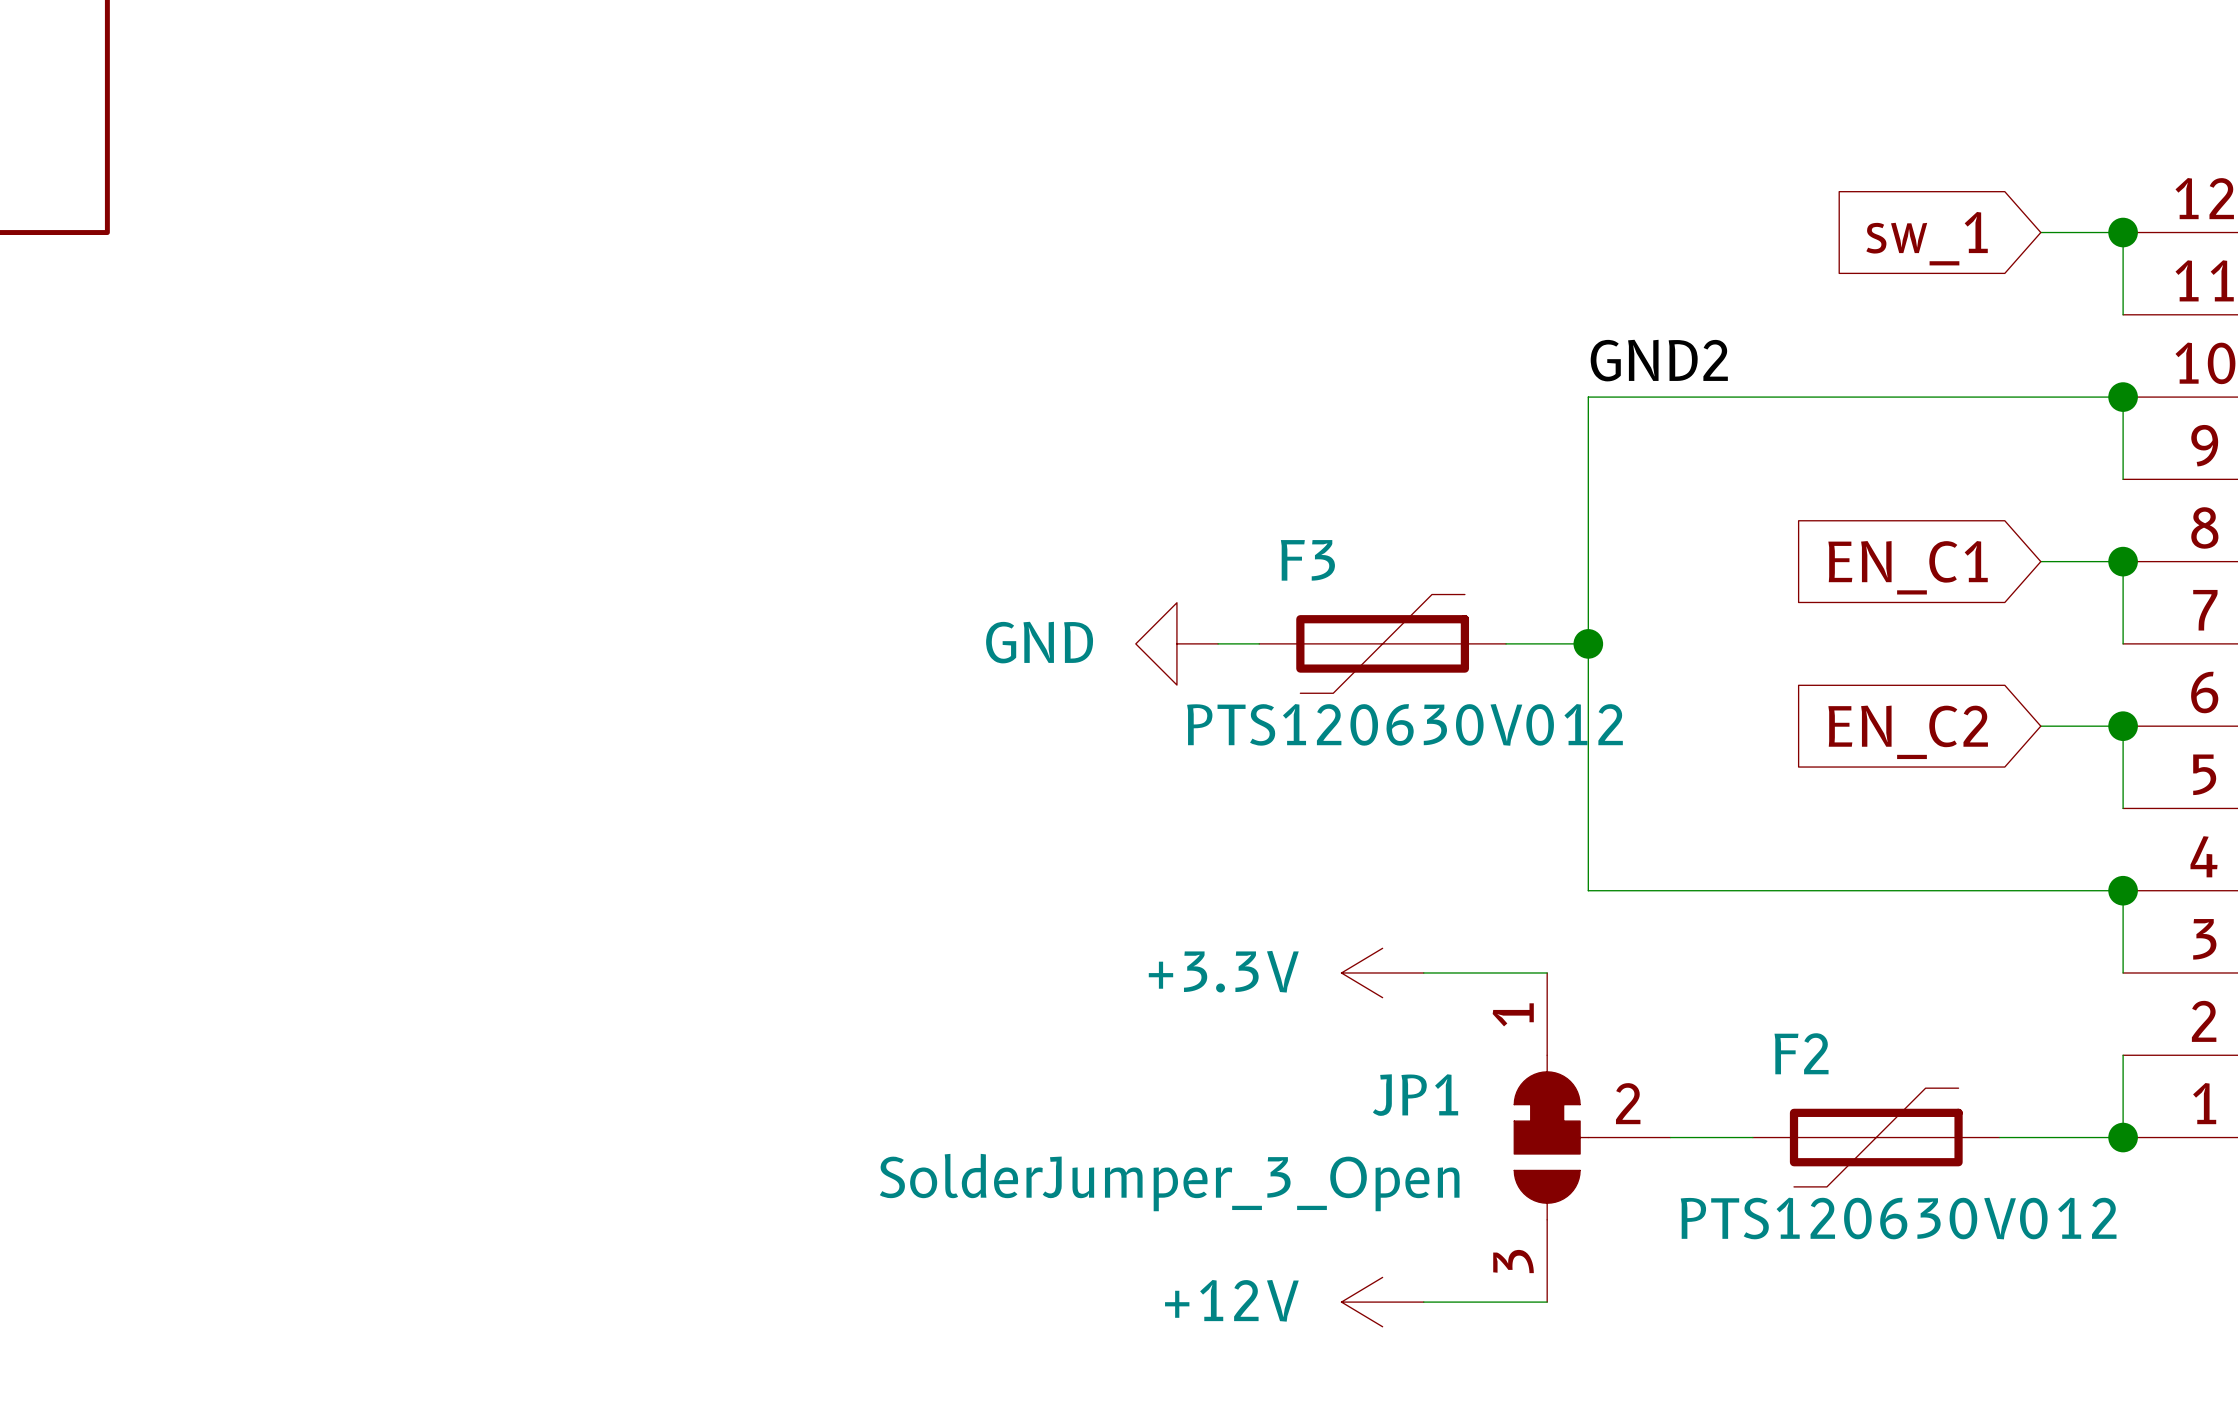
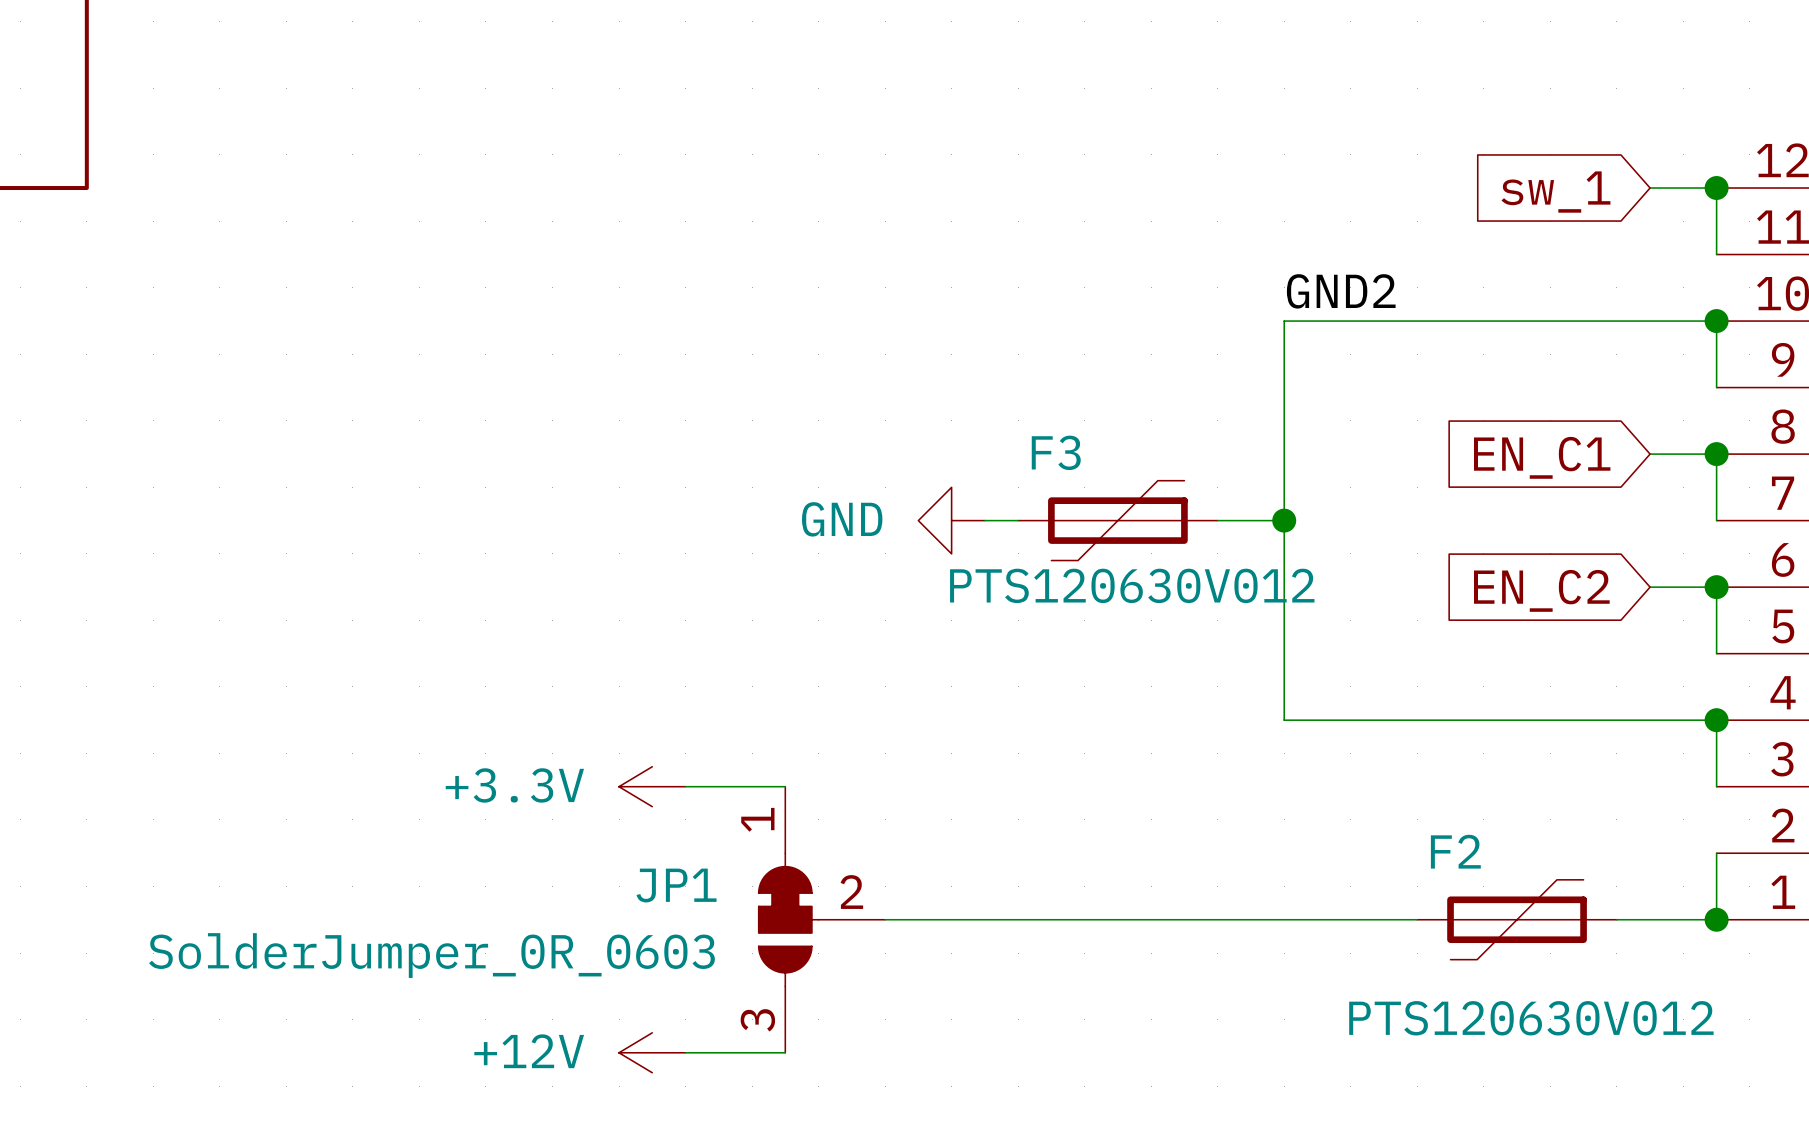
power symbol position: +3.3V (1382, 972) -> +3.3V (652, 786)
wire: (1423, 972) (1547, 972) -> (685, 786) (785, 786)
wire: none -> (885, 919) (1350, 919)
JP1 position: (1592, 1137) -> (821, 919)
JP1 value: SolderJumper_3_Open (1169, 1182) -> SolderJumper_0R_0603 (431, 955)
F2 value position: PTS120630V012 (1898, 1218) -> PTS120630V012 (1531, 1018)
power symbol position: +12V (1382, 1302) -> +12V (652, 1052)
wire: (1423, 1302) (1547, 1302) -> (685, 1052) (785, 1052)

